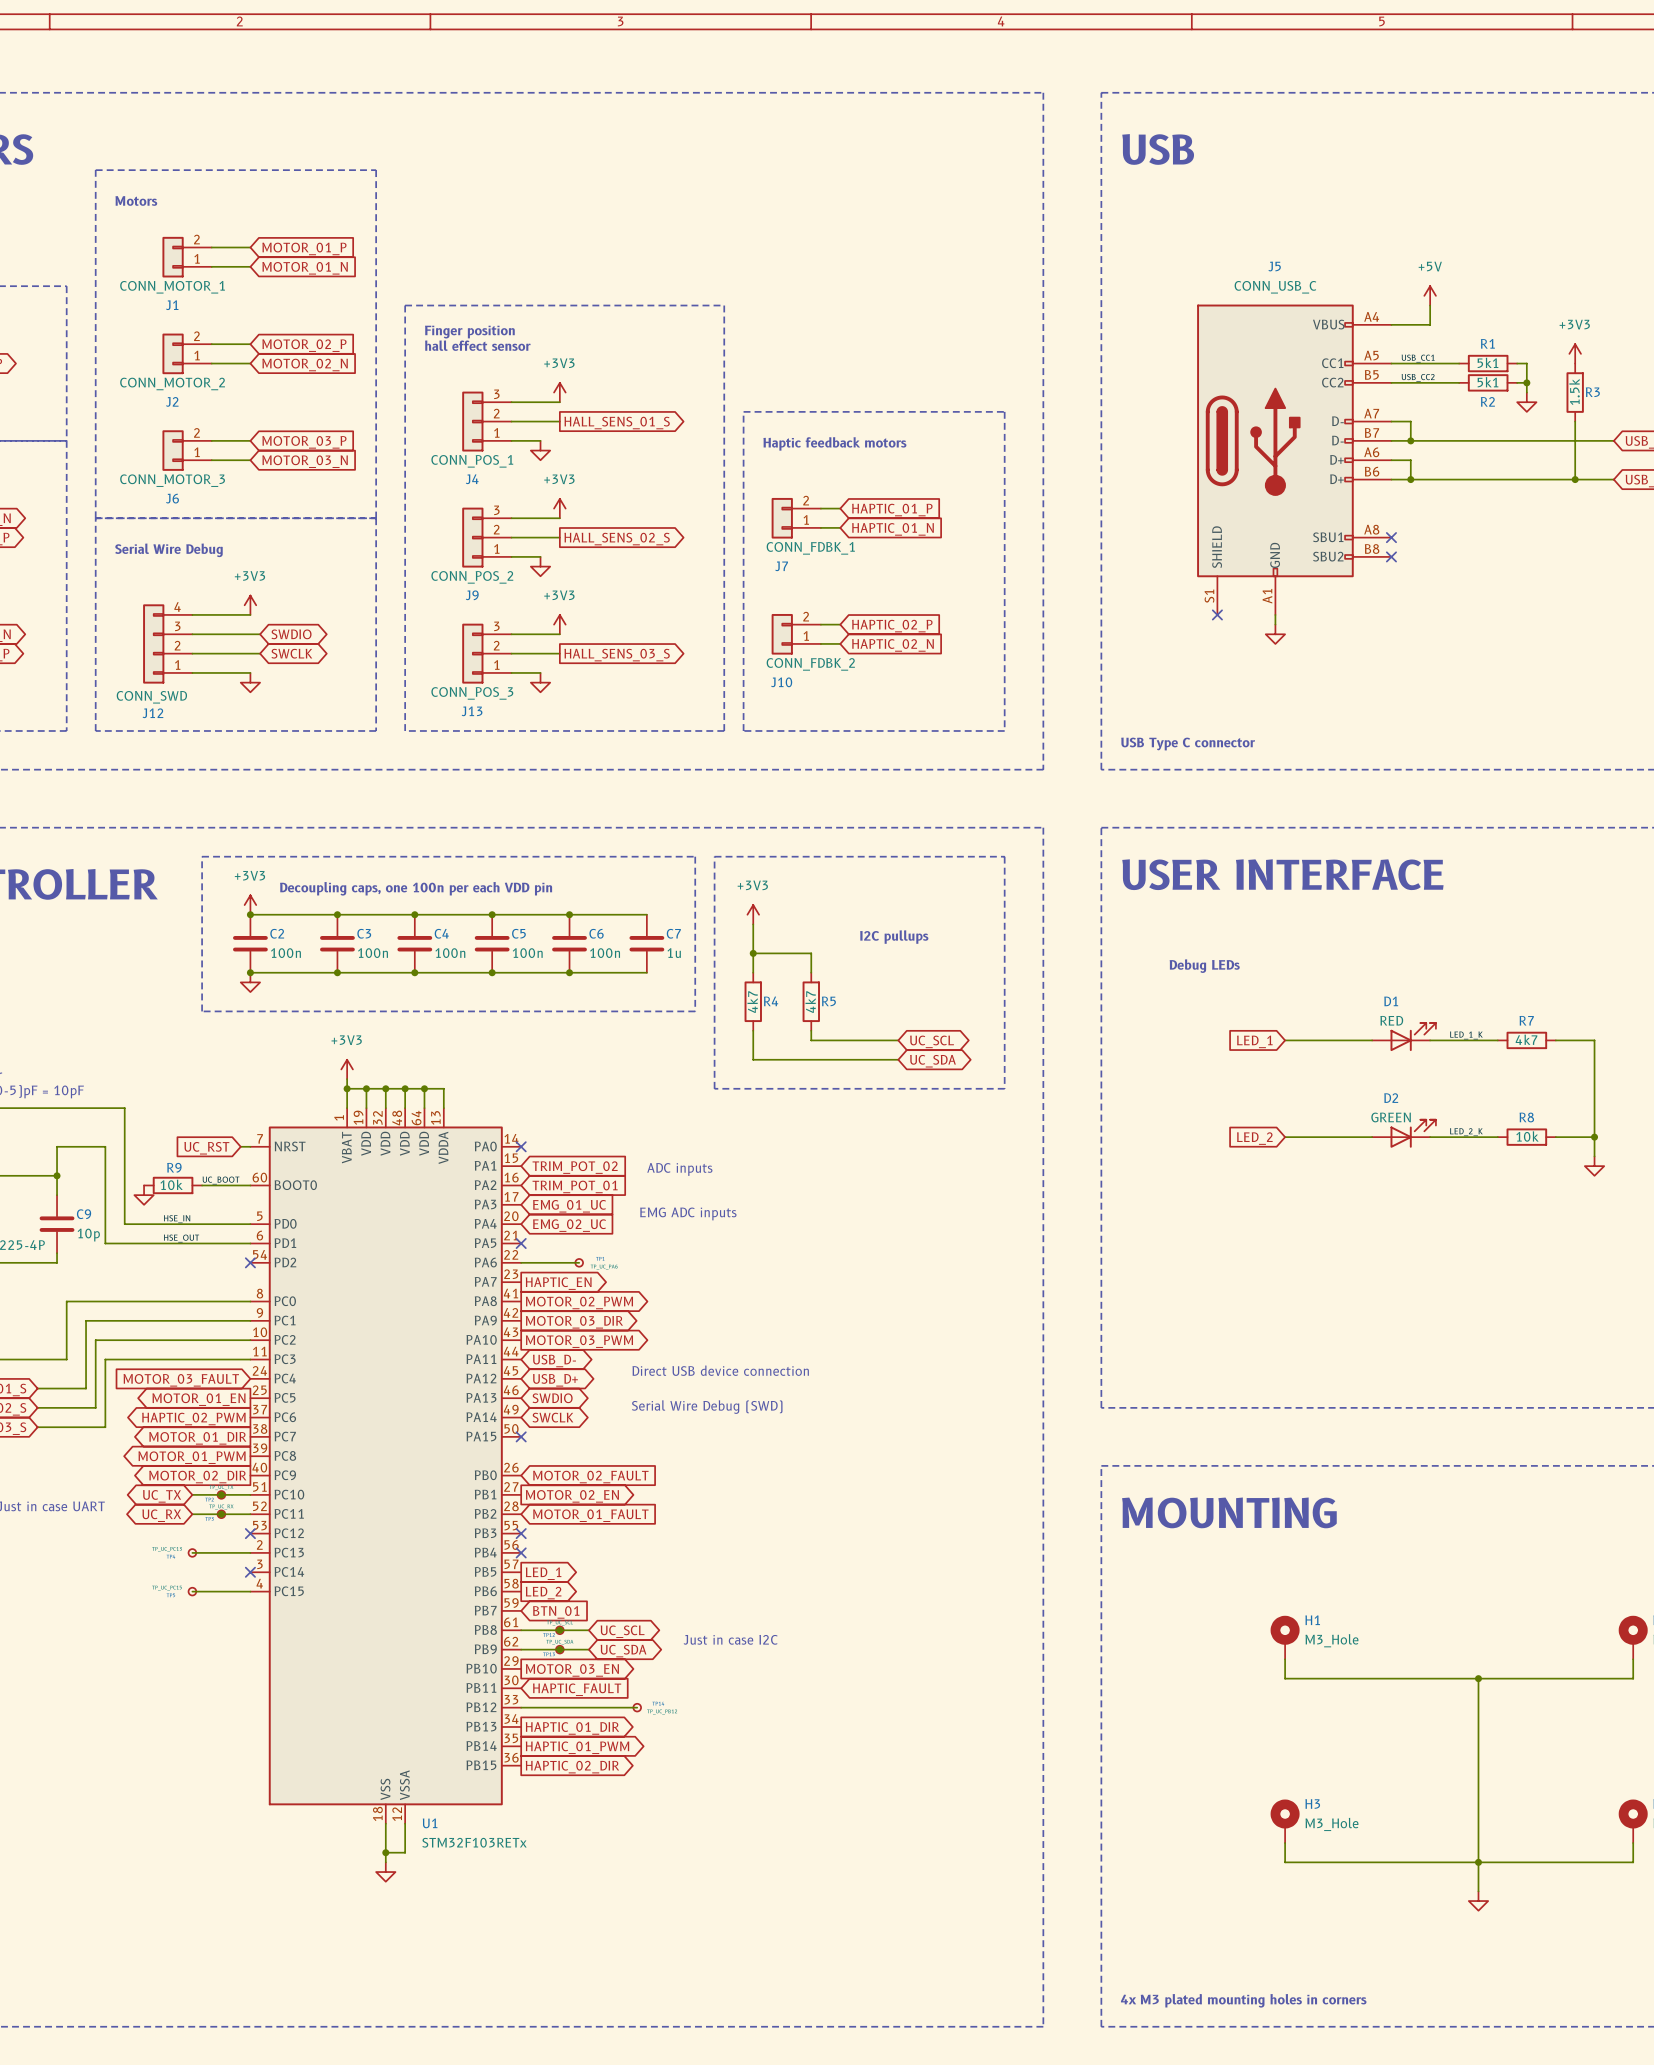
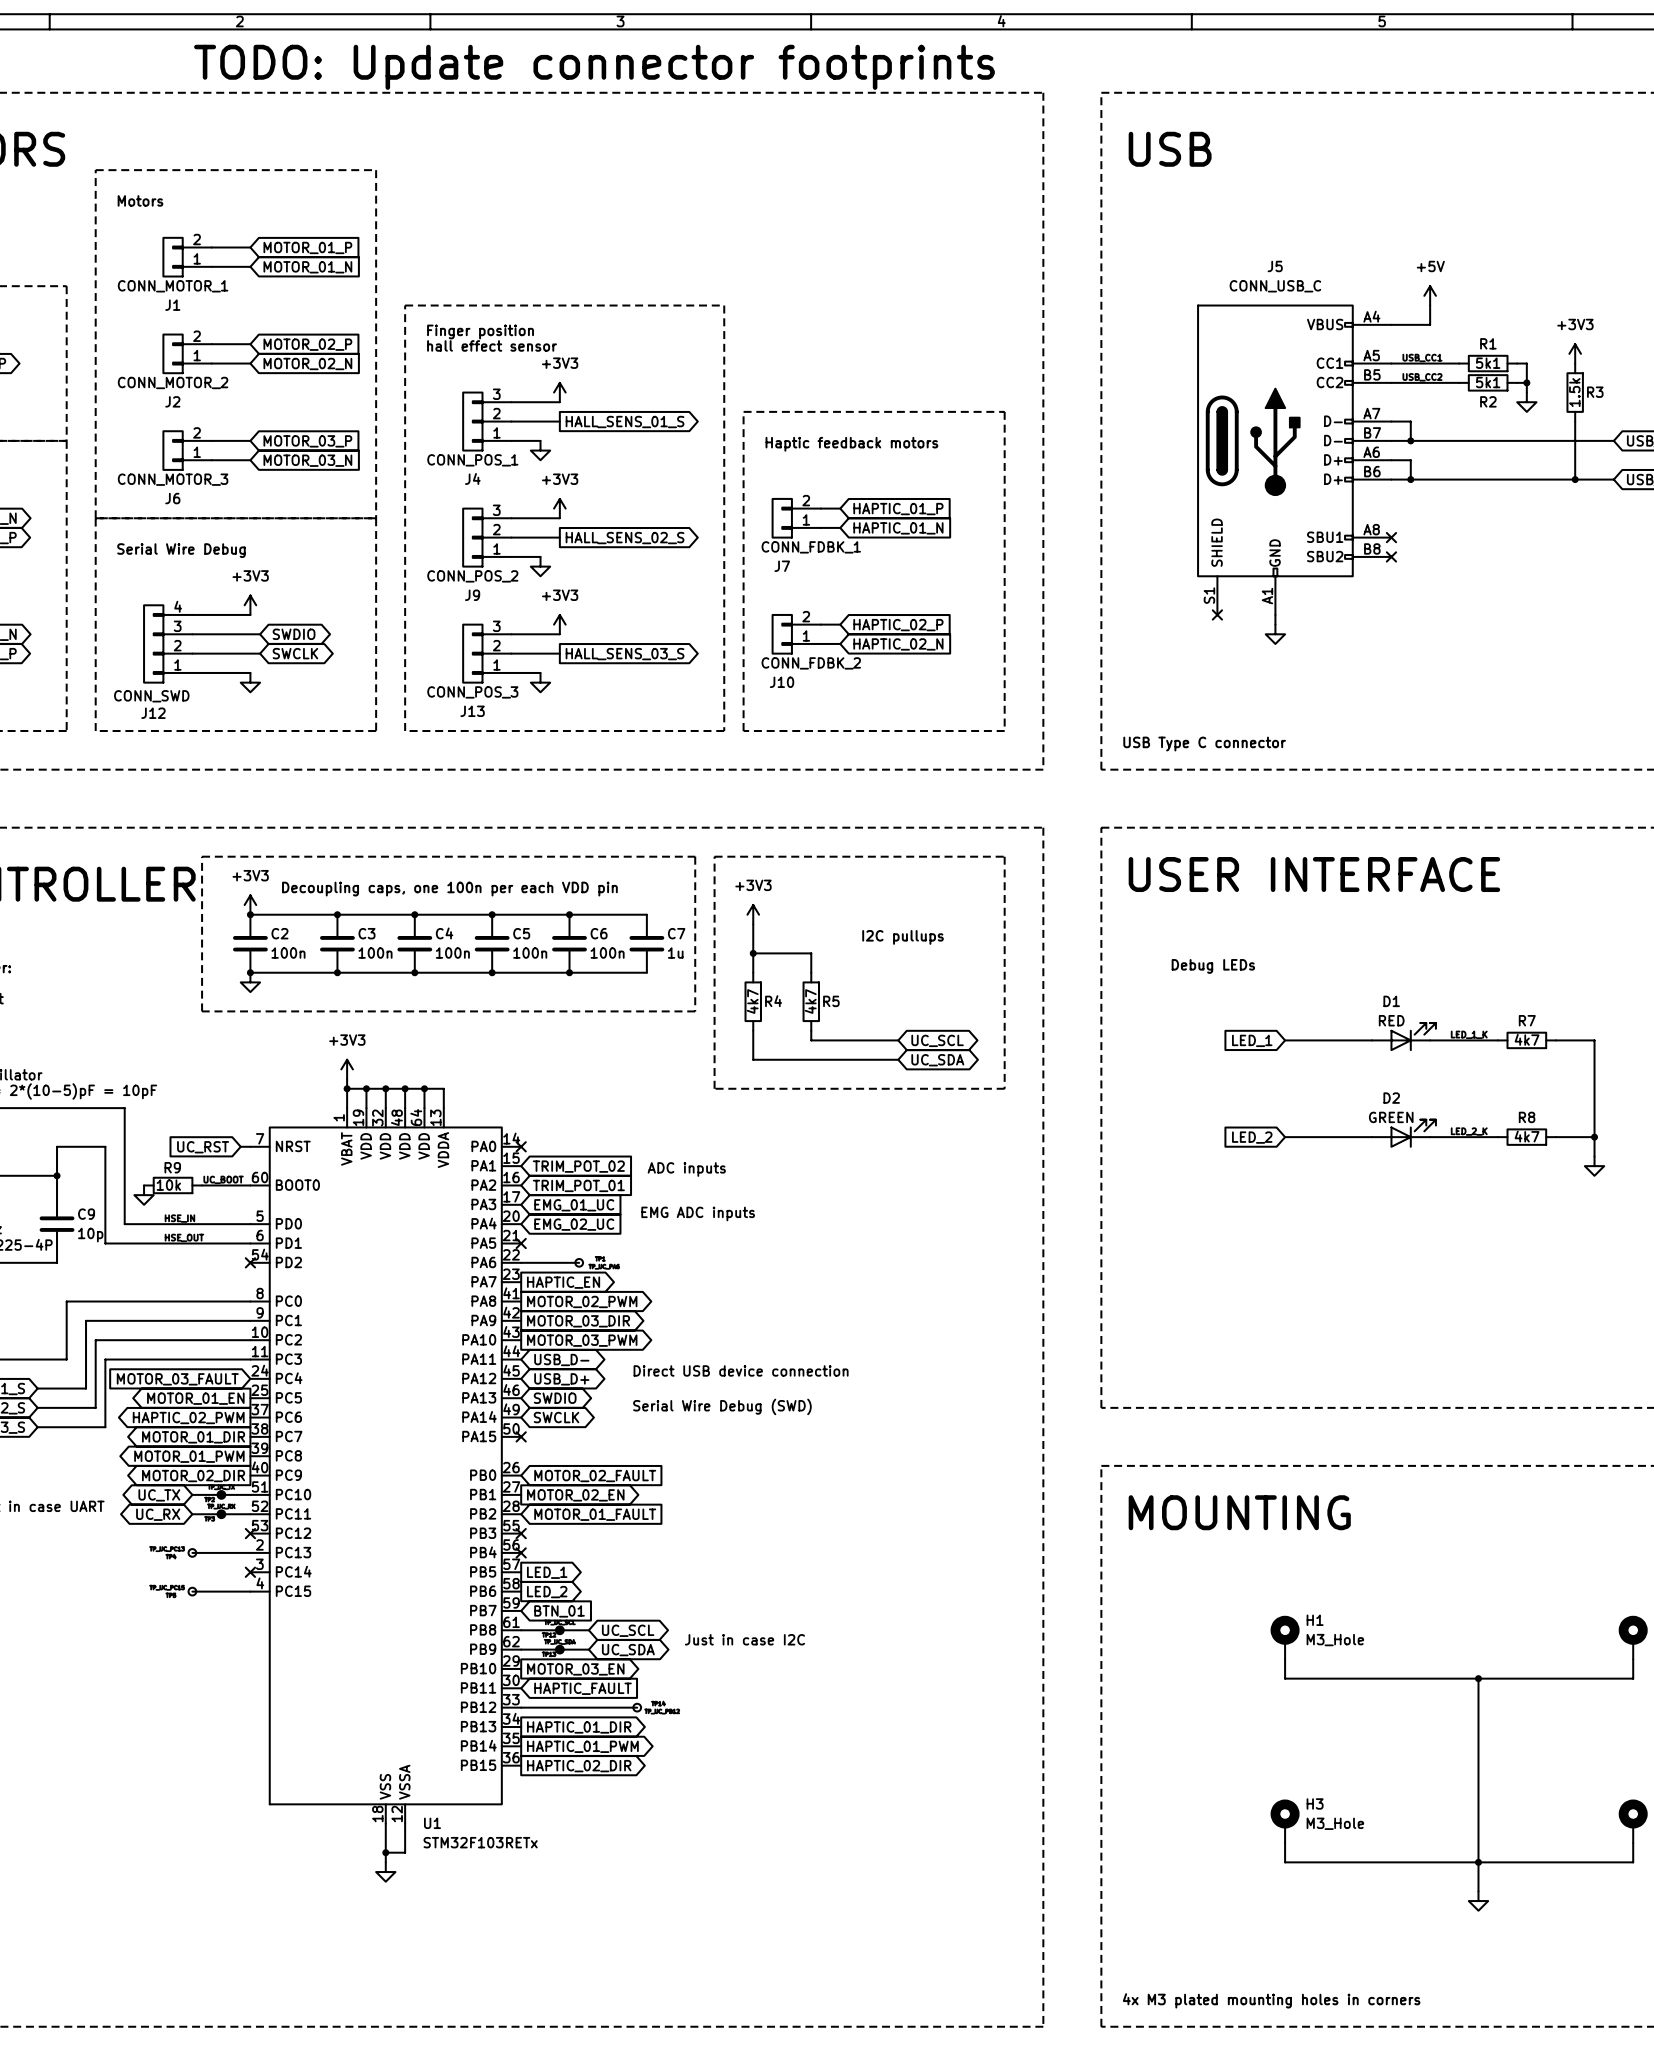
text: none -> TODO: Update connector footprints (594, 67)
R8 value: 10k (1527, 1136) -> 4k7 (1527, 1136)

